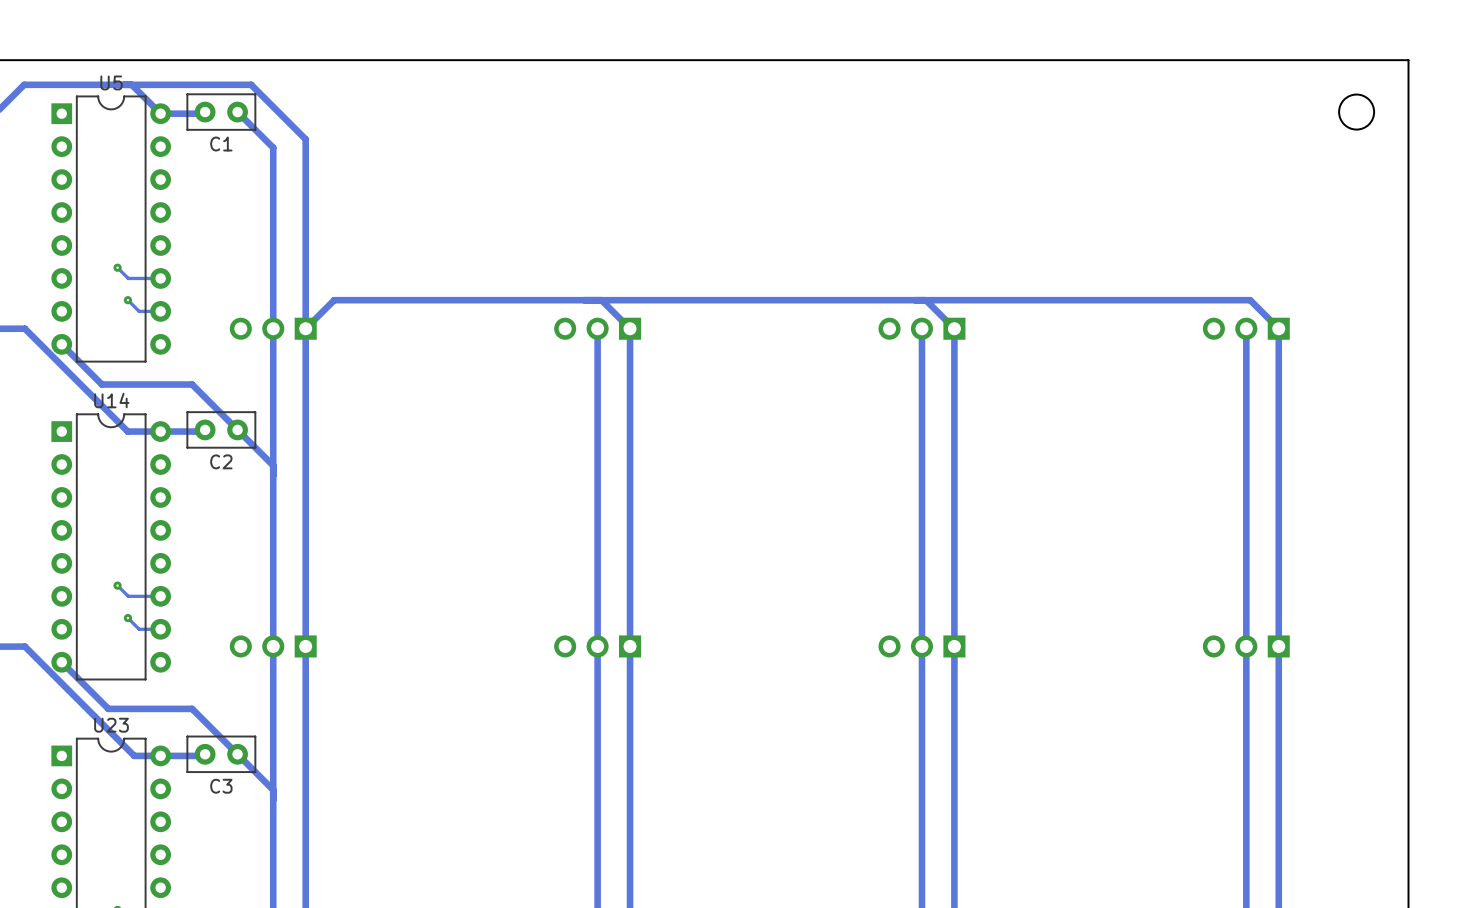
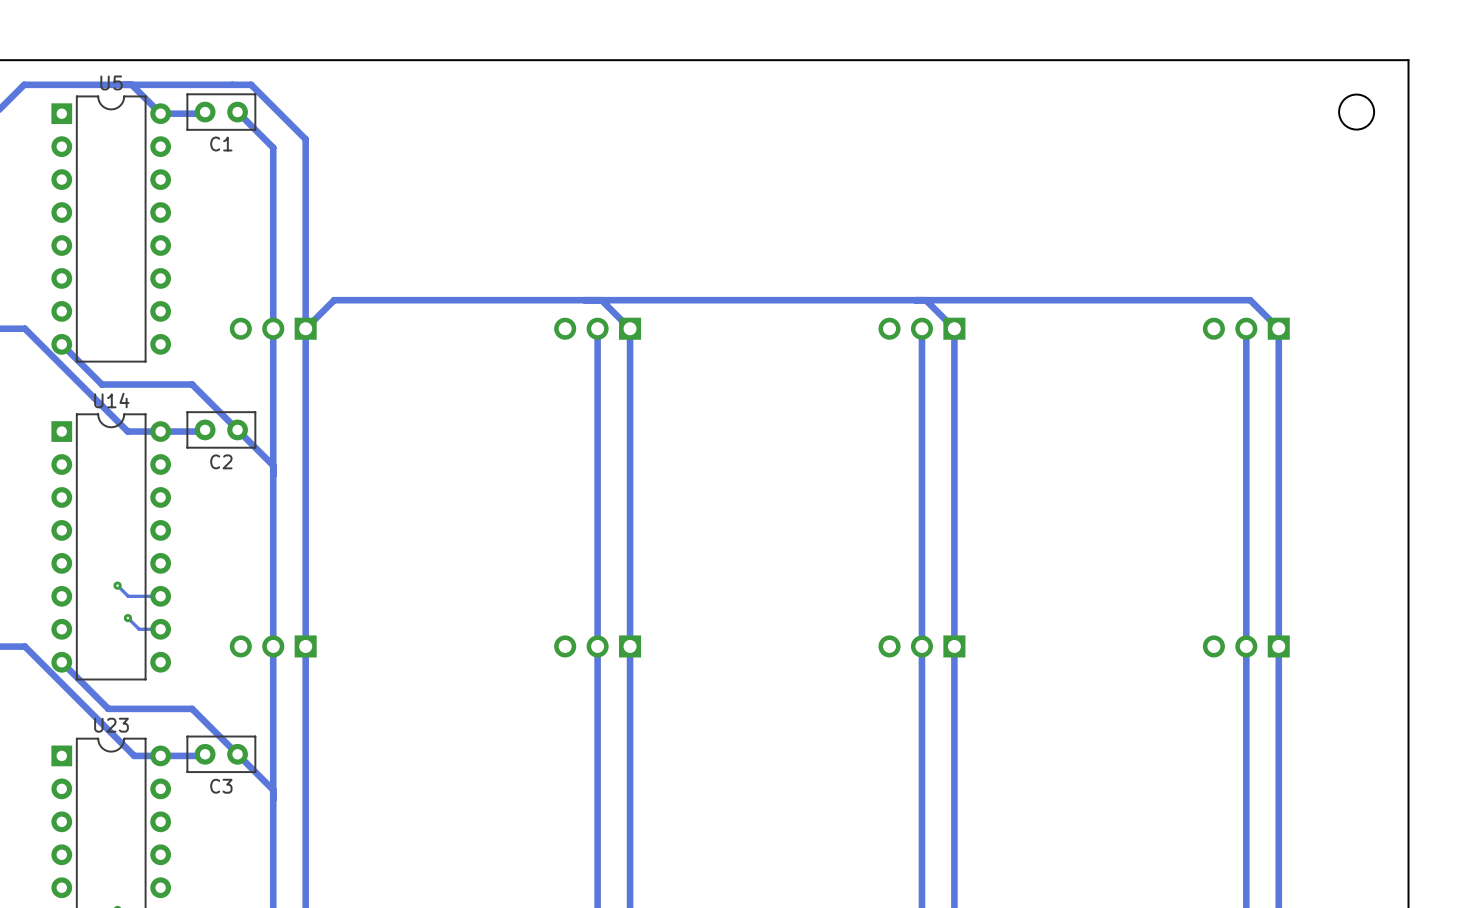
track: (117, 267) (128, 278) (160, 278) -> none
via: (117, 267) -> none
track: (127, 300) (139, 311) (160, 311) -> none
via: (127, 300) -> none

